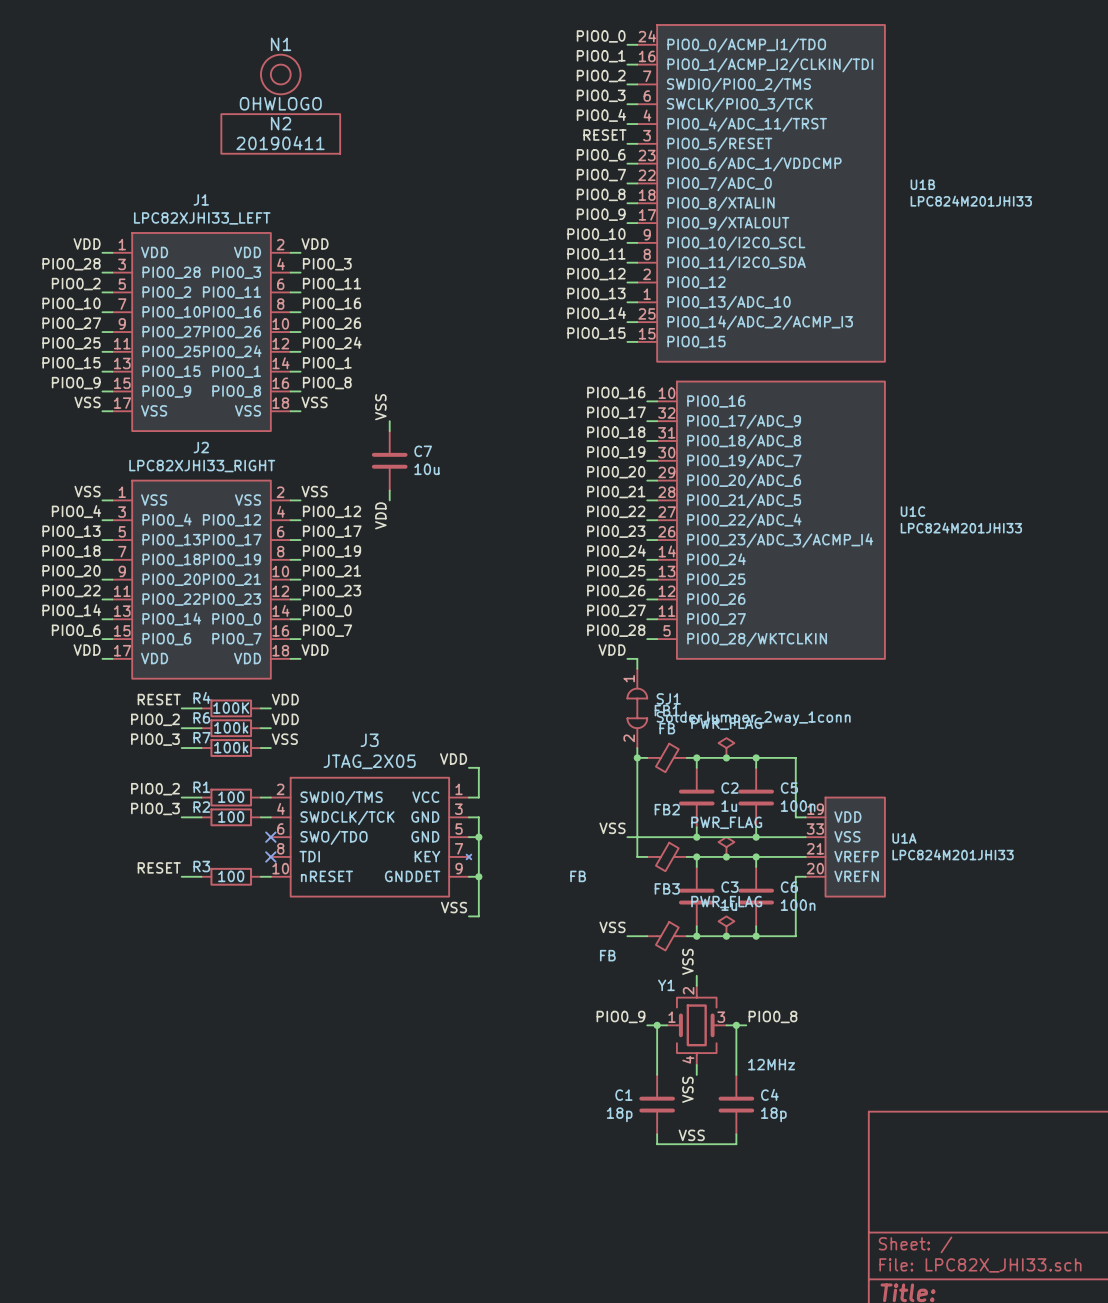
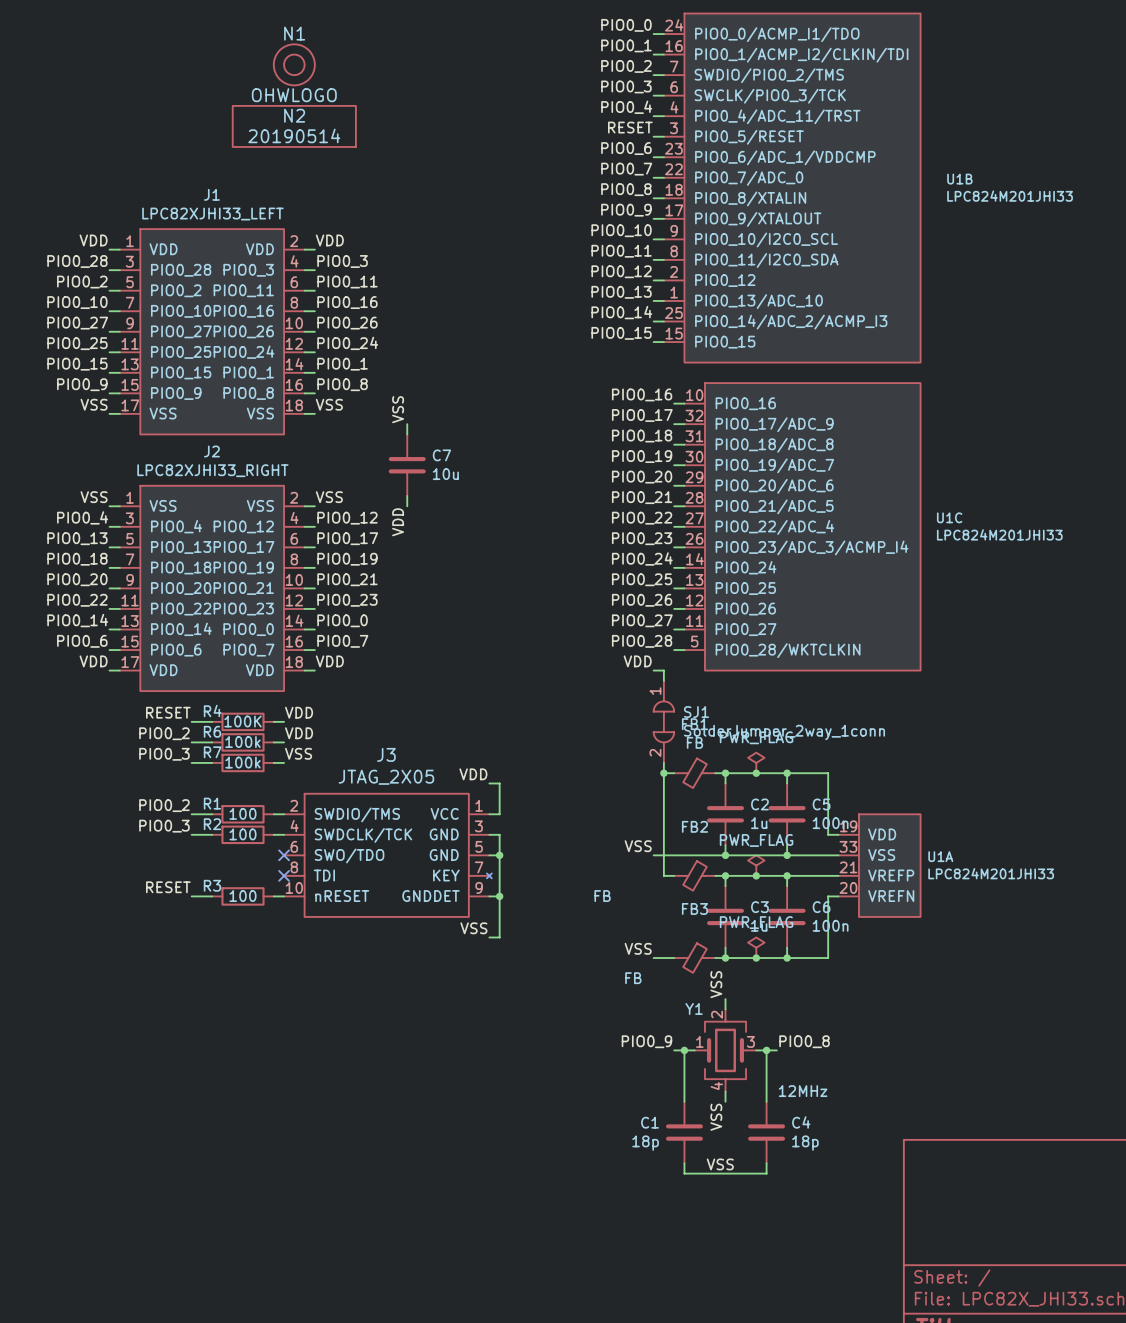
N2 value: 20190411 (280, 143) -> 20190514 (294, 135)

